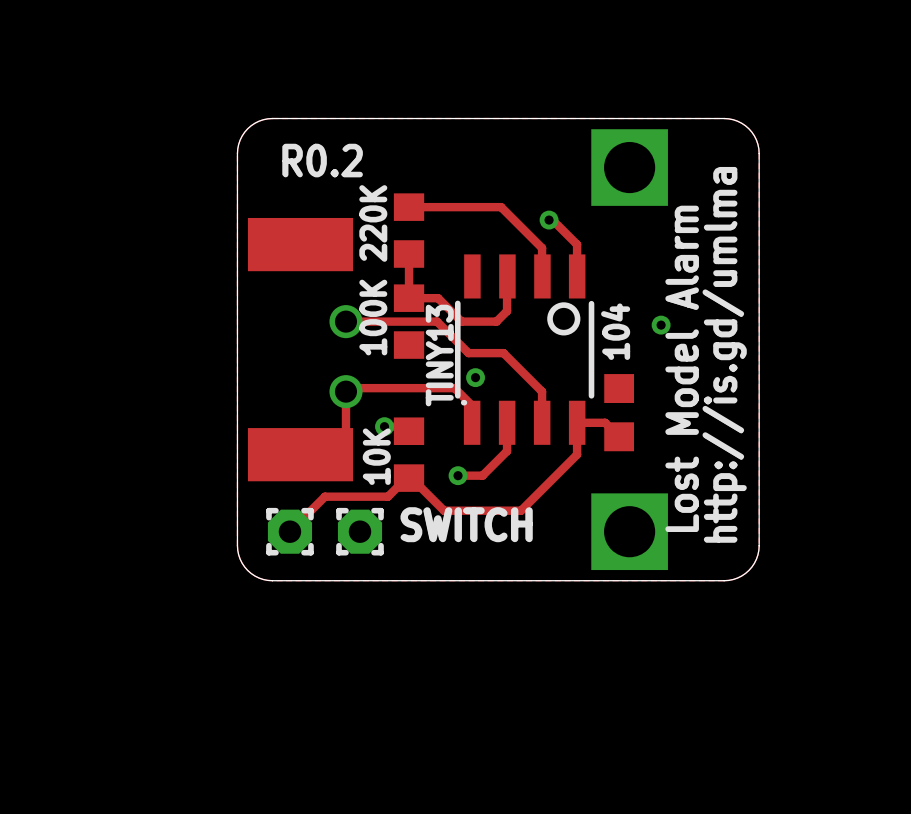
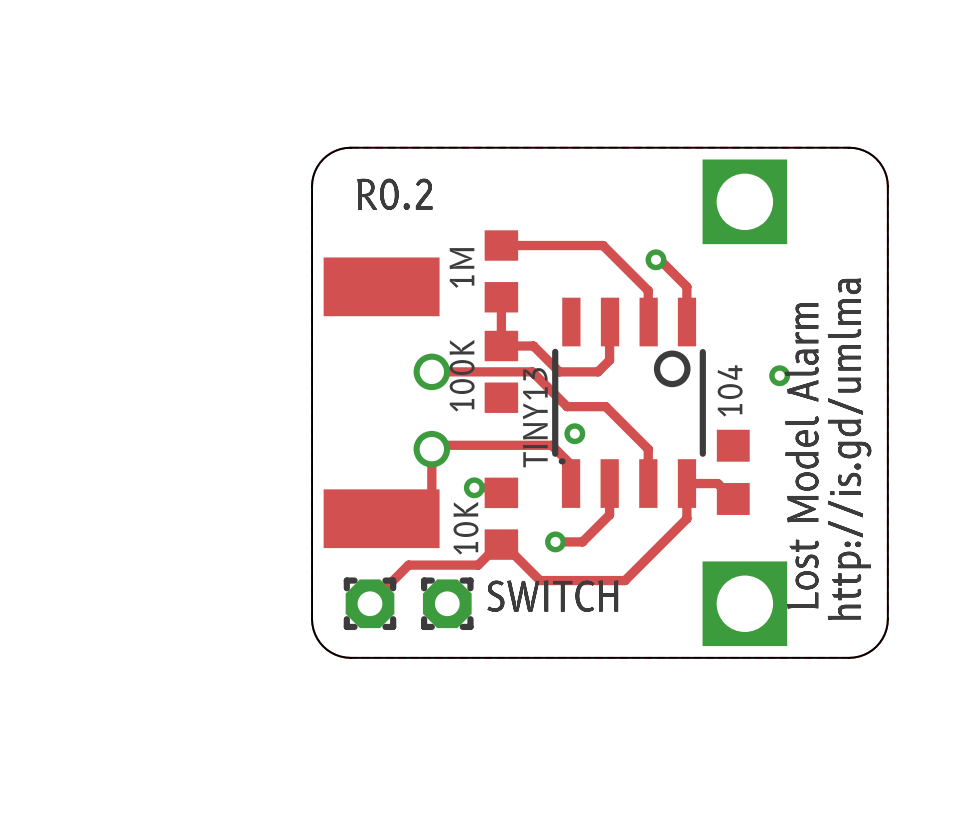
text: 220K (373, 223) -> 1M (461, 267)

